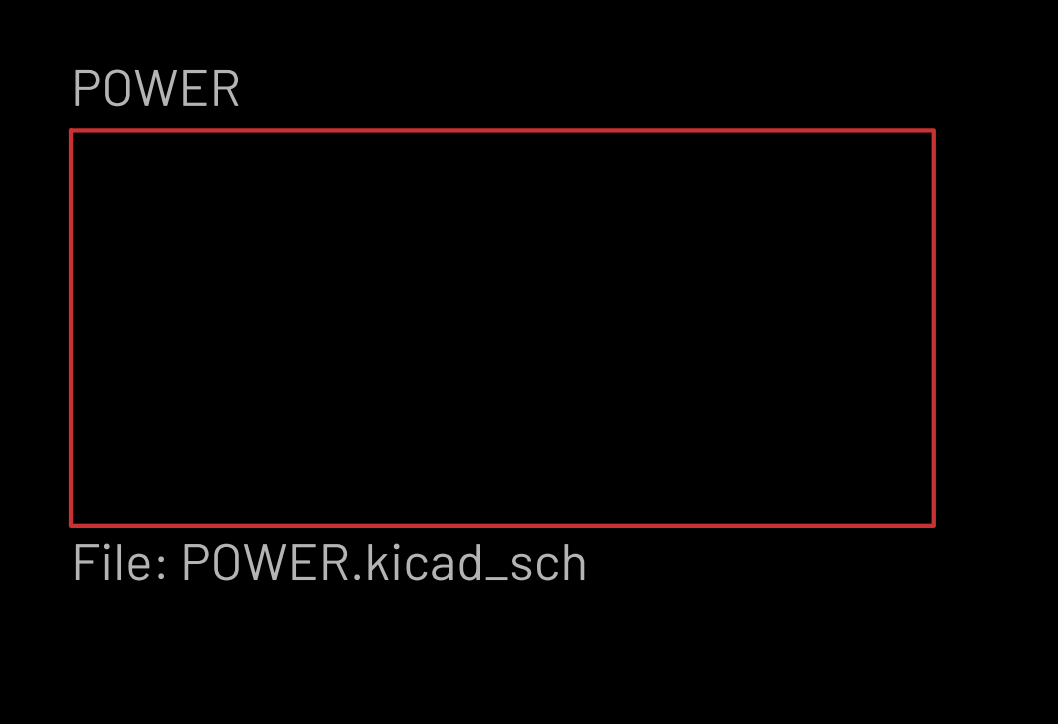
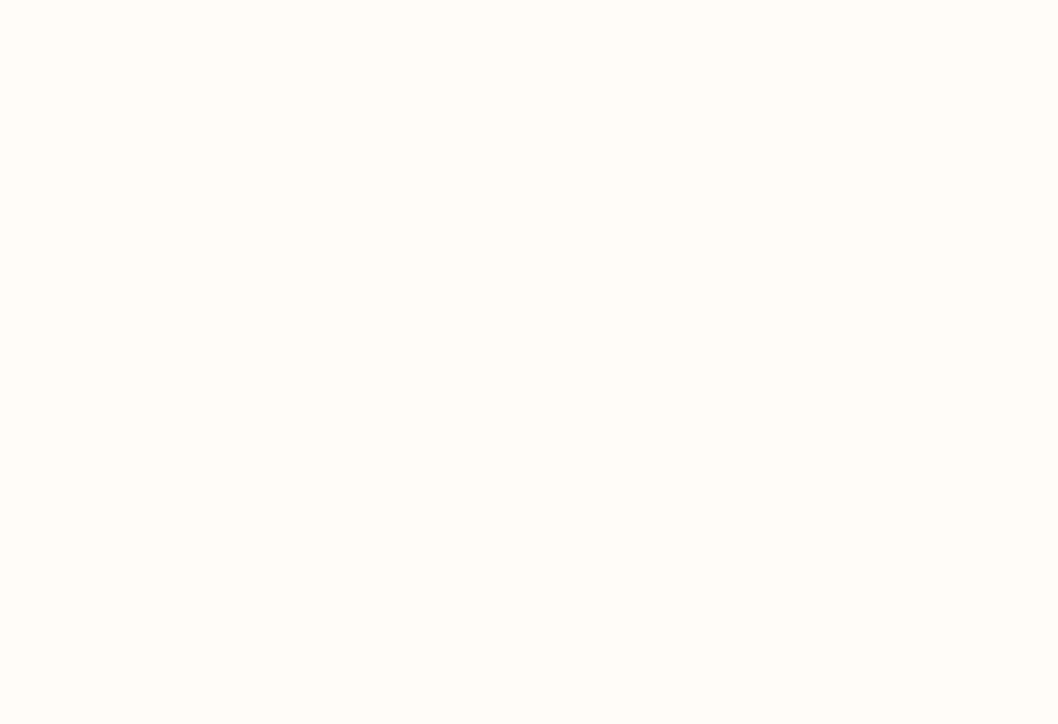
sheet POWER: File: POWER.kicad_sch (502, 328) -> none

